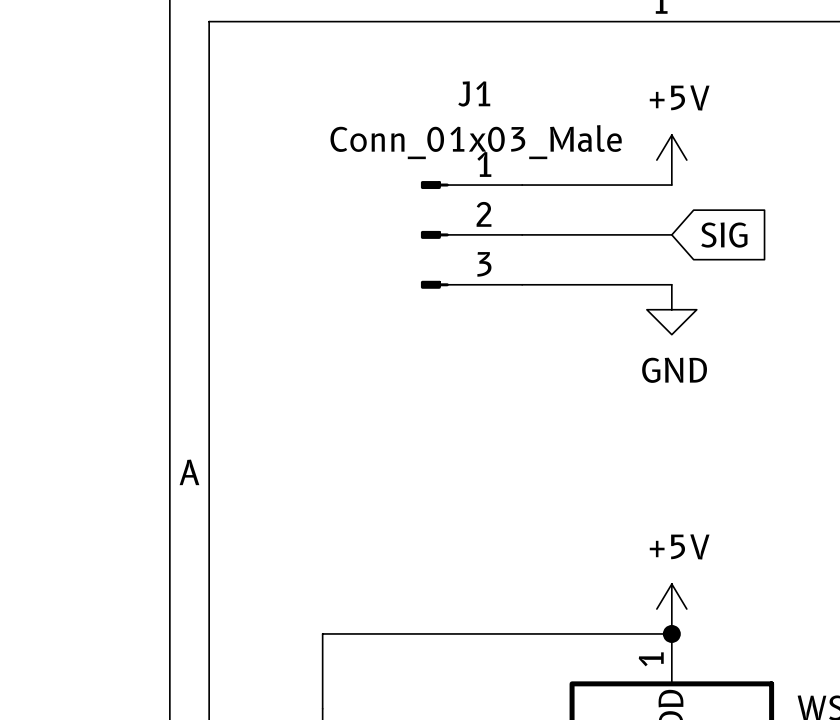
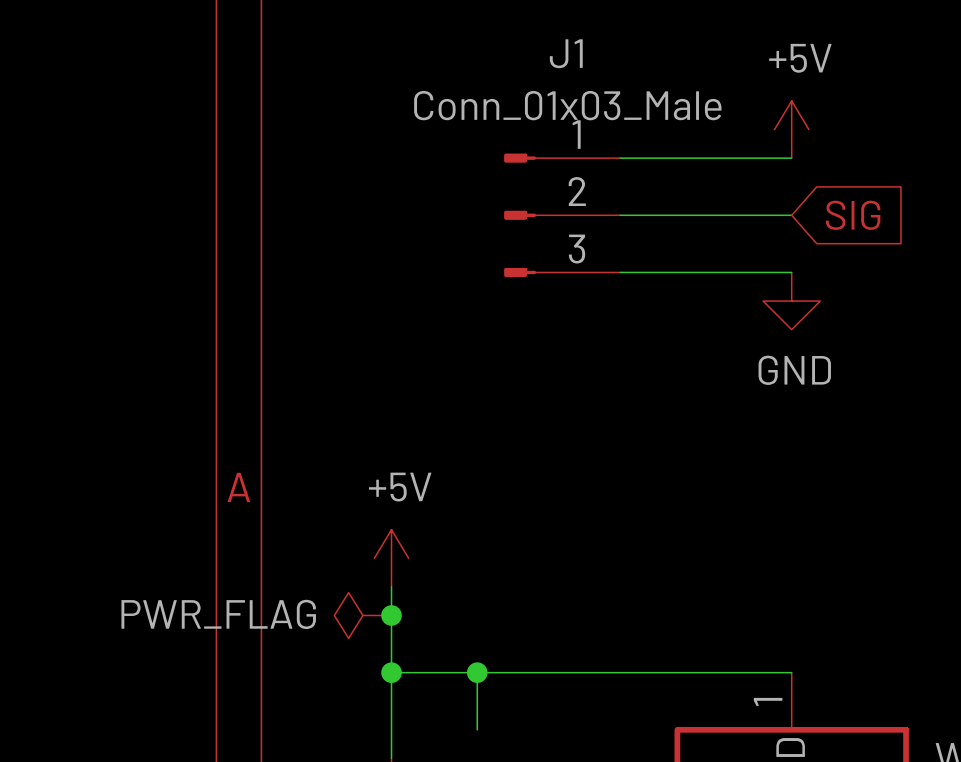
wire: none -> (391, 586) (391, 672)
power symbol: none -> PWR_FLAG (362, 615)
junction: none -> (391, 615)
power symbol position: +5V (671, 609) -> +5V (391, 558)
junction: none -> (391, 672)
wire: none -> (477, 672) (477, 729)
junction: none -> (477, 672)
junction: (671, 633) -> none

